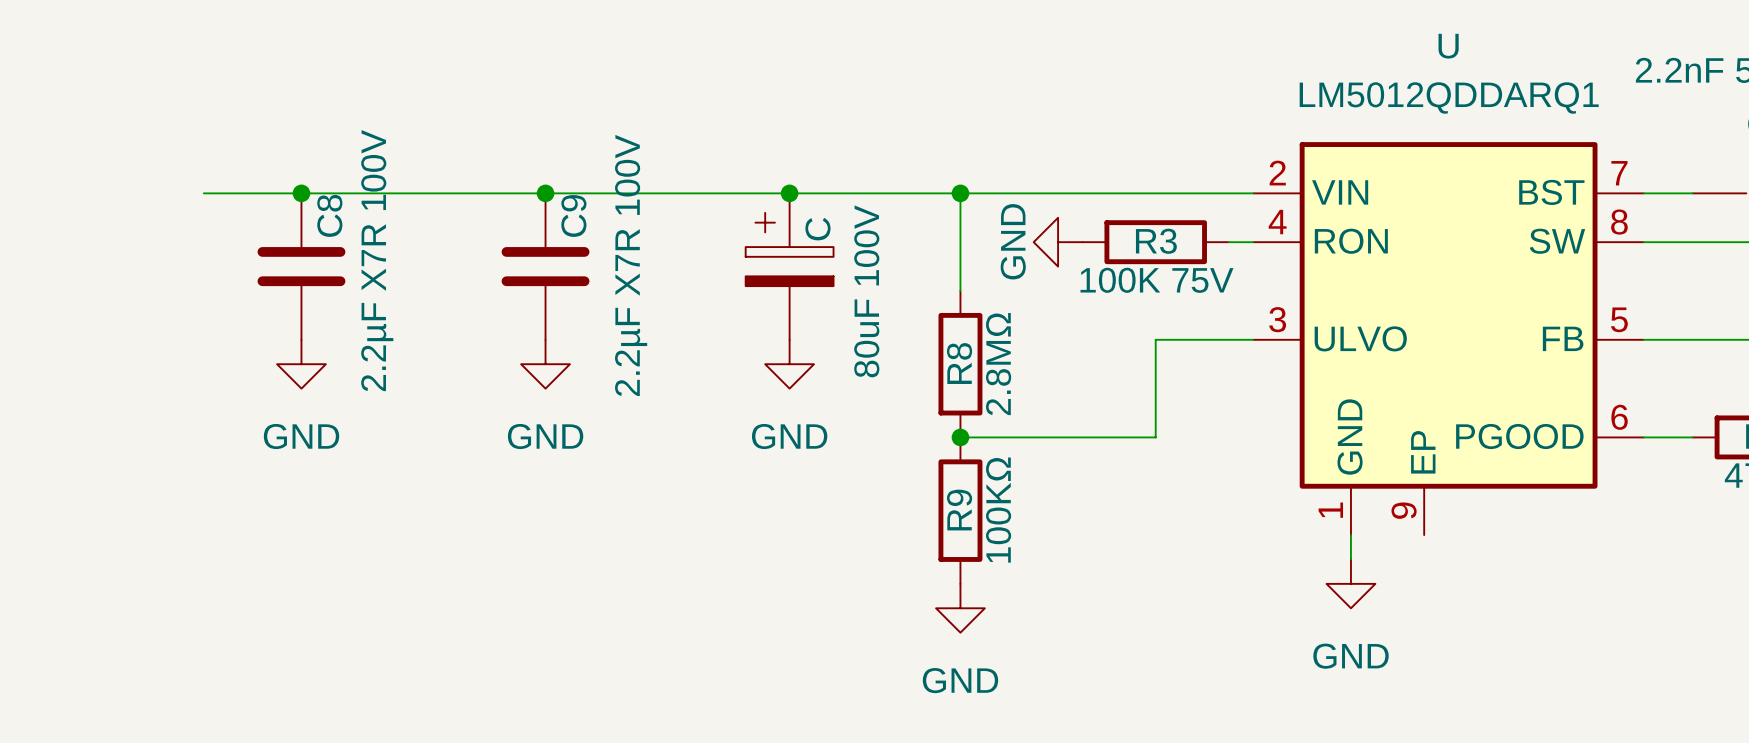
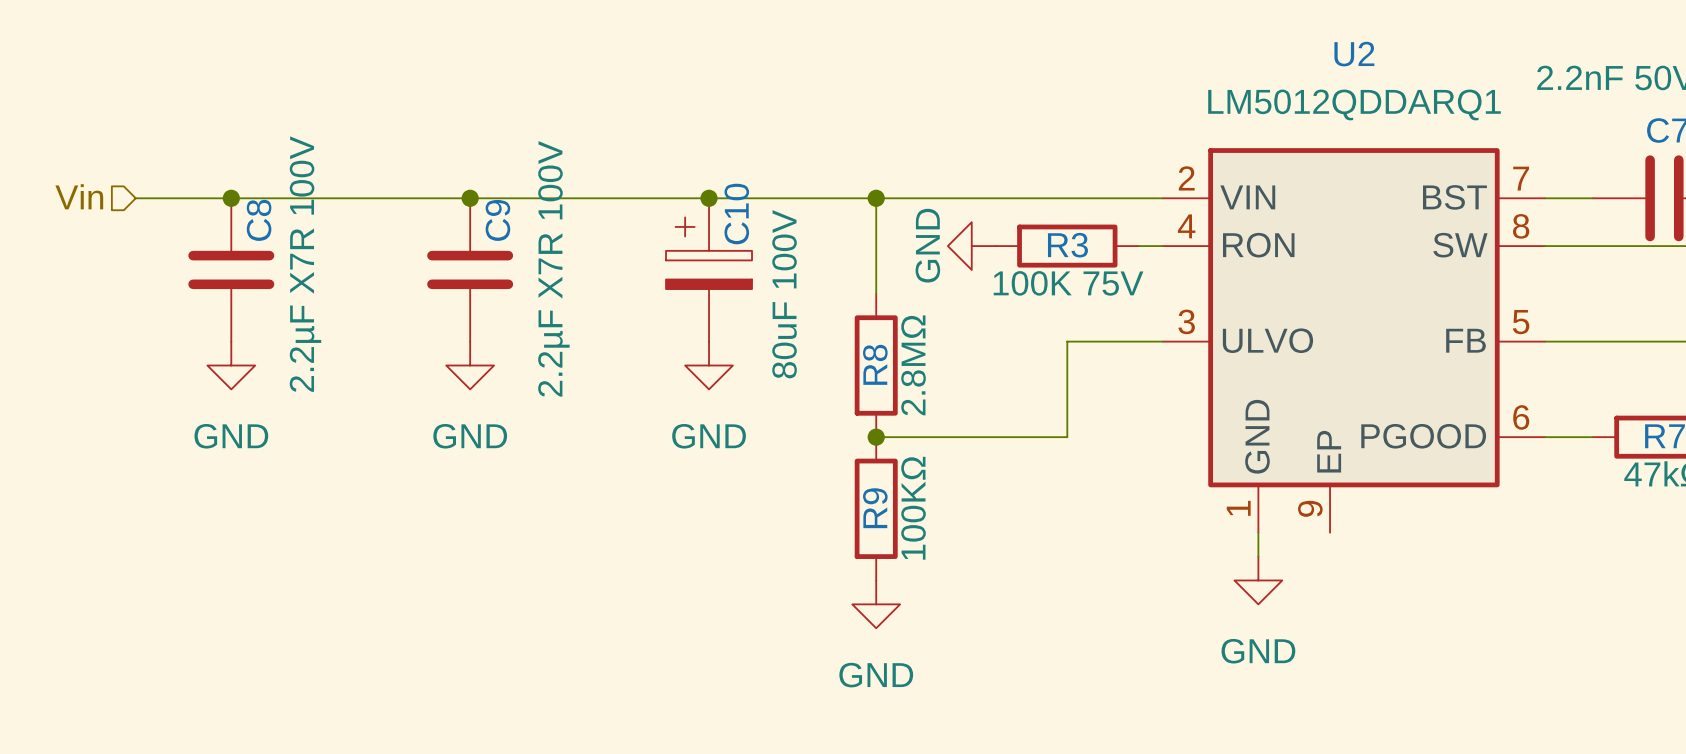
U name: U (1448, 46) -> U2 (1354, 54)
hierarchical label: none -> Vin (79, 196)
C name: C (817, 229) -> C10 (736, 214)

